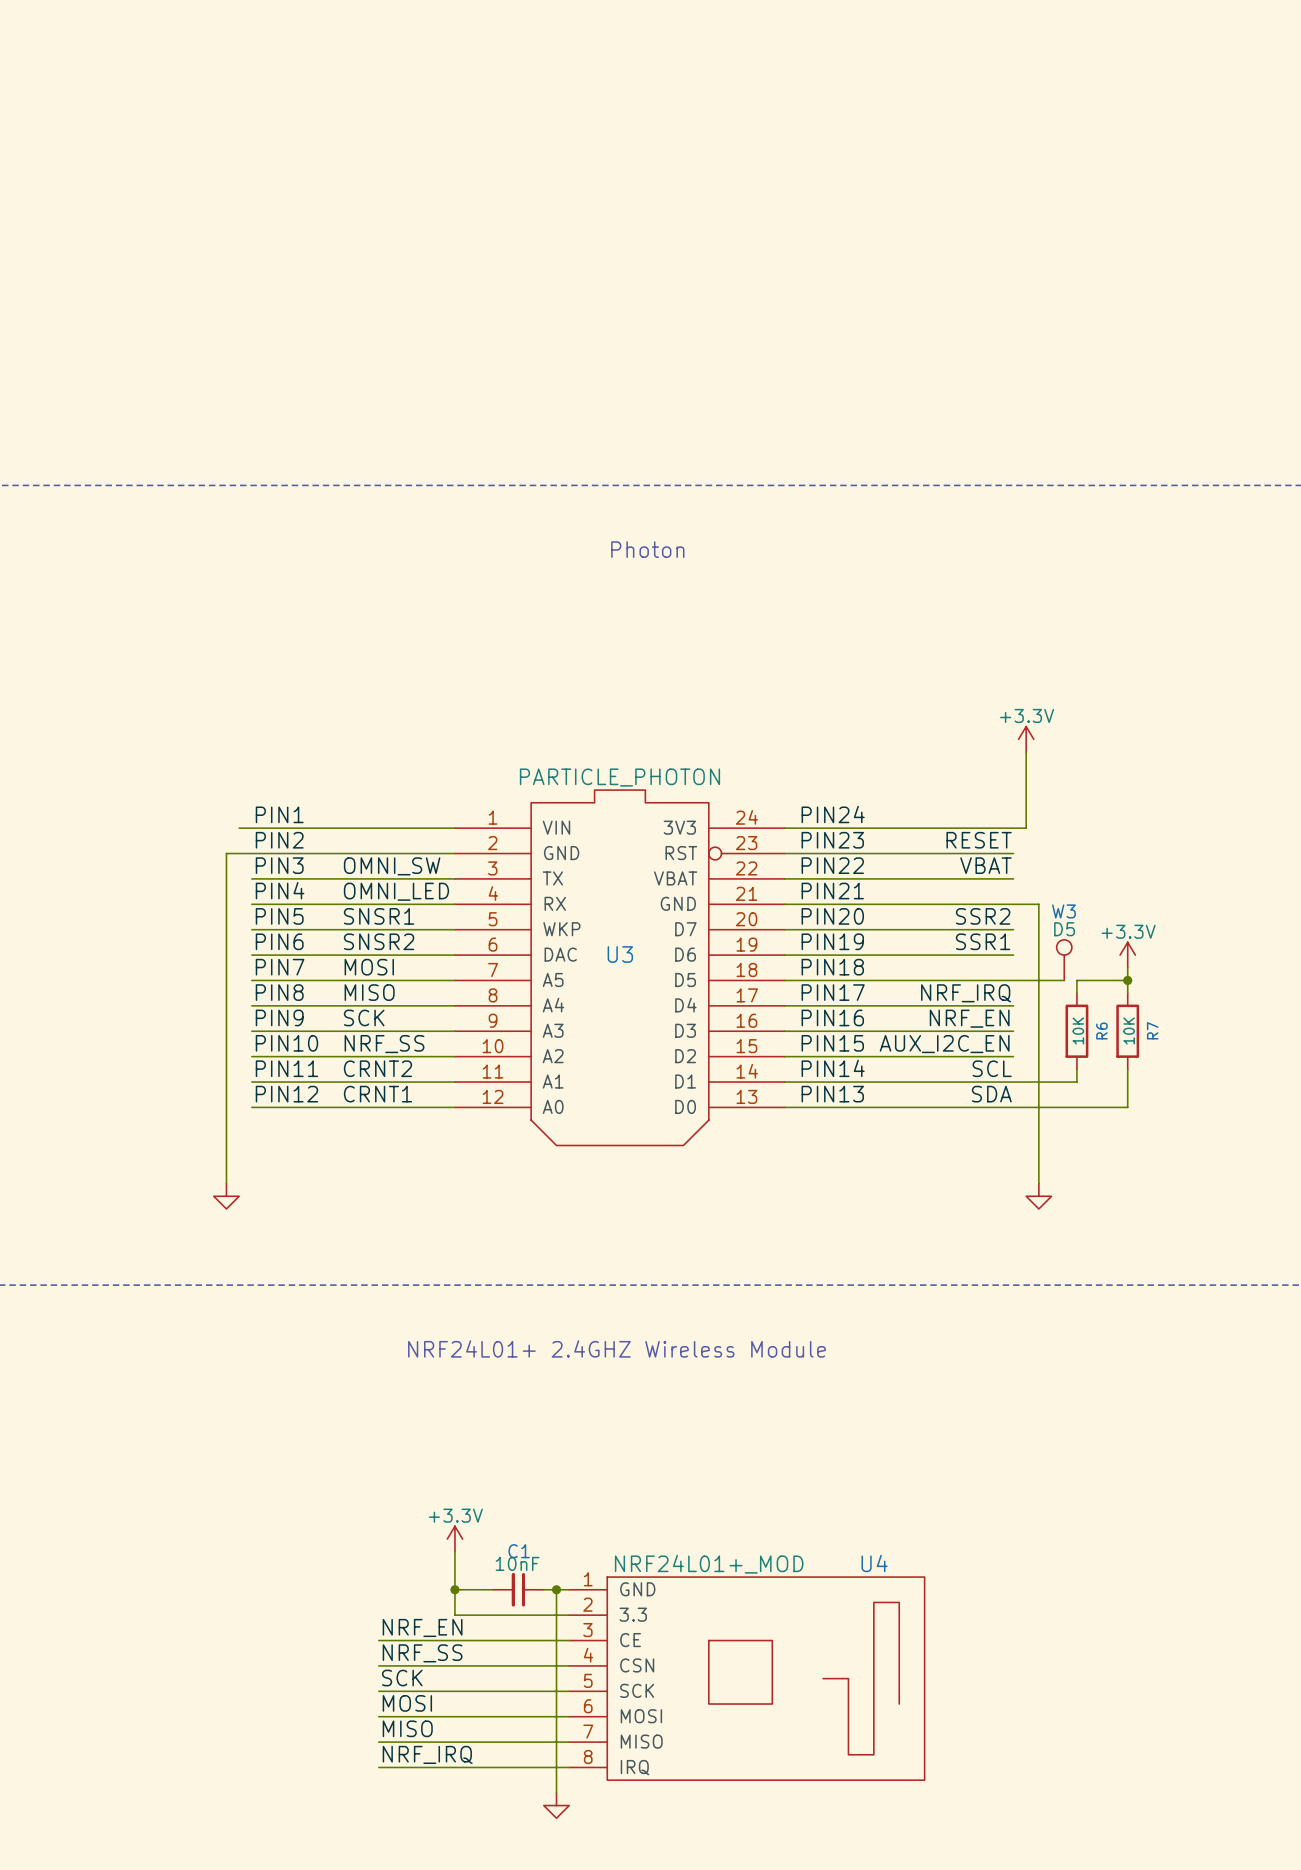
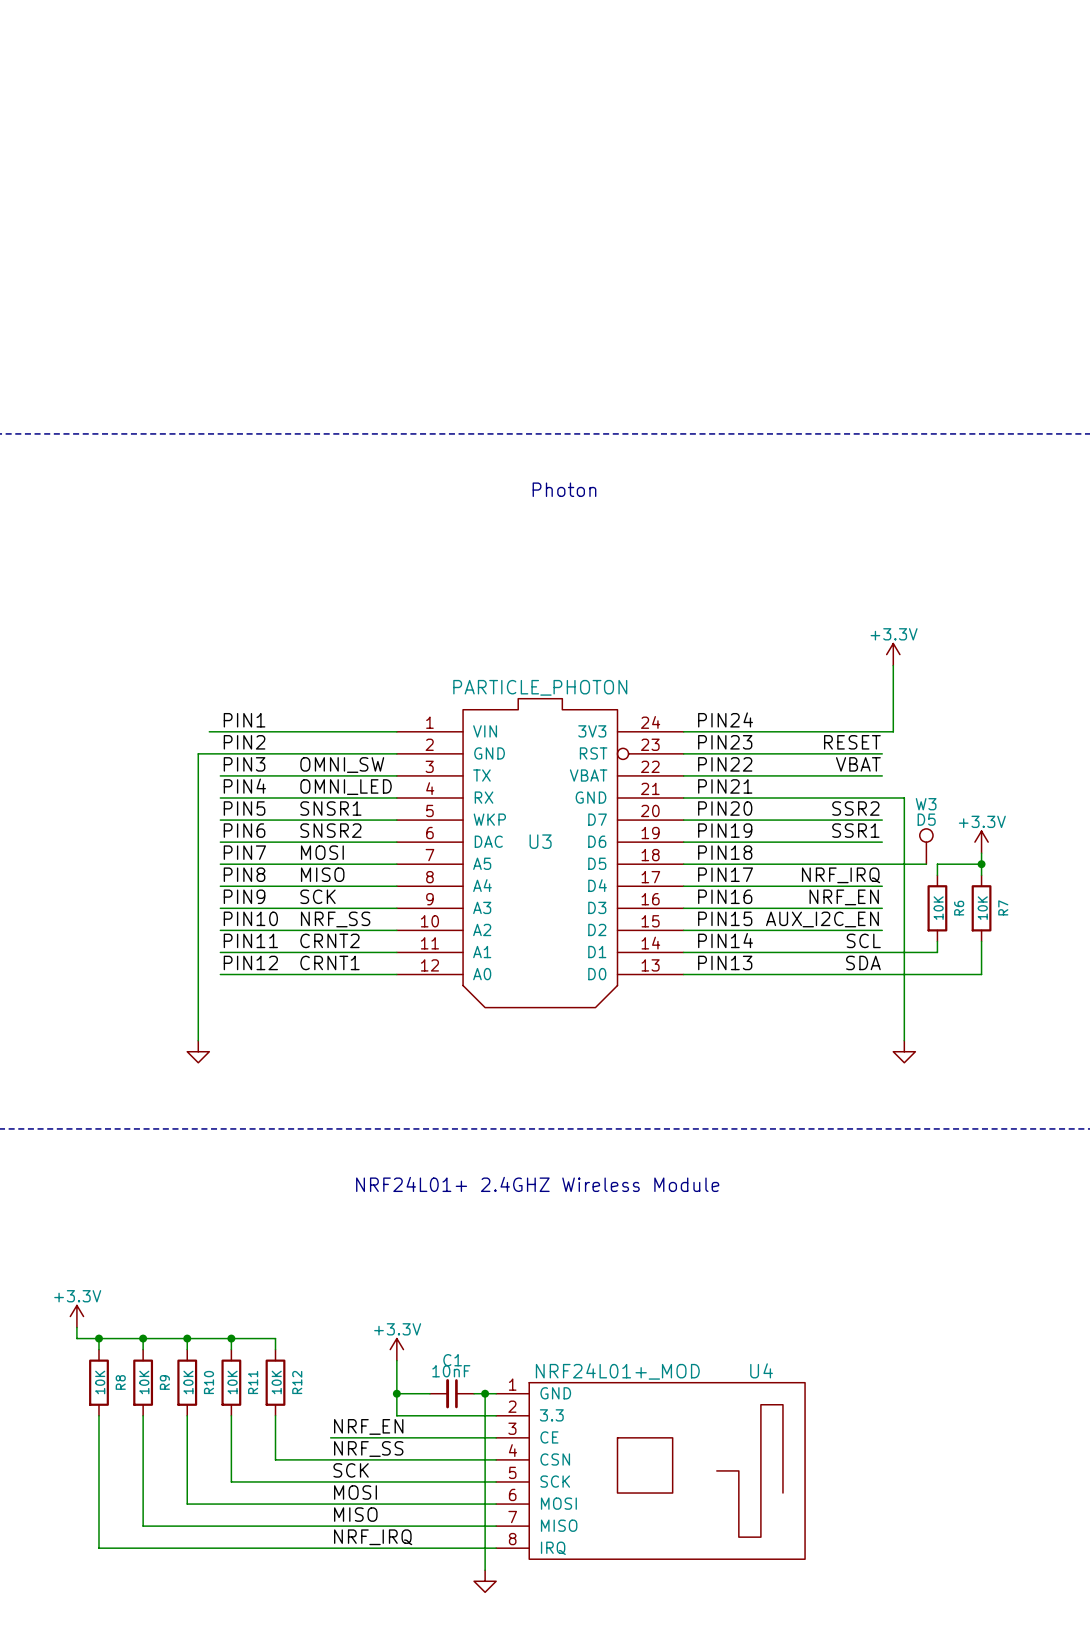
power symbol: none -> +3.3V (76, 1316)
wire: none -> (76, 1327) (76, 1338) (275, 1338) (275, 1349)
wire: none -> (98, 1338) (98, 1349)
junction: none -> (98, 1338)
wire: none -> (143, 1338) (143, 1349)
junction: none -> (143, 1338)
wire: none -> (187, 1338) (187, 1349)
junction: none -> (187, 1338)
wire: none -> (231, 1338) (231, 1349)
junction: none -> (231, 1338)
R8: none -> 10K (98, 1382)
R9: none -> 10K (143, 1382)
R10: none -> 10K (187, 1382)
R11: none -> 10K (231, 1382)
R12: none -> 10K (275, 1382)
wire: none -> (98, 1415) (98, 1548) (330, 1548)
wire: none -> (143, 1415) (143, 1526) (330, 1526)
wire: none -> (187, 1415) (187, 1504) (330, 1504)
wire: none -> (231, 1415) (231, 1481) (330, 1481)
wire: none -> (275, 1415) (275, 1459) (330, 1459)

